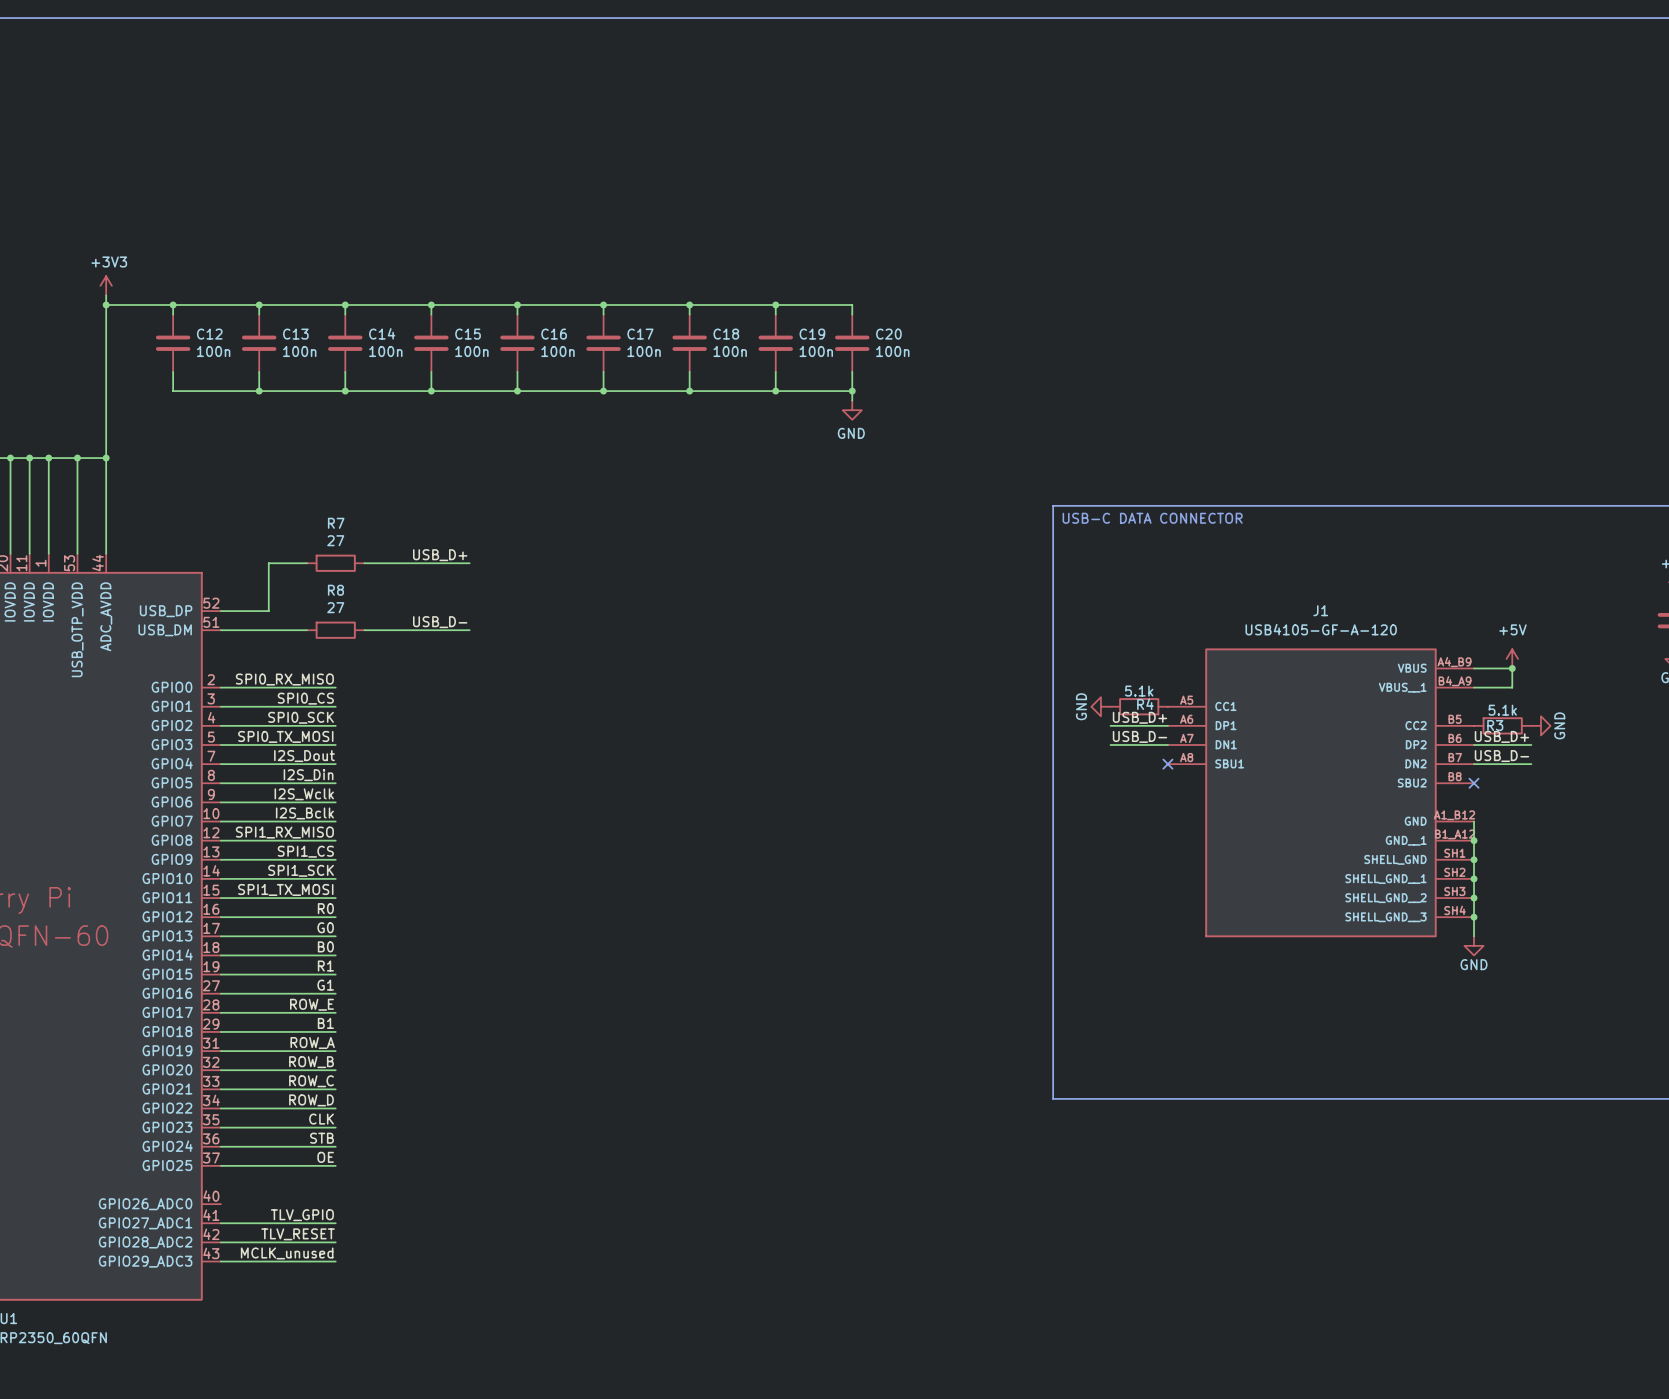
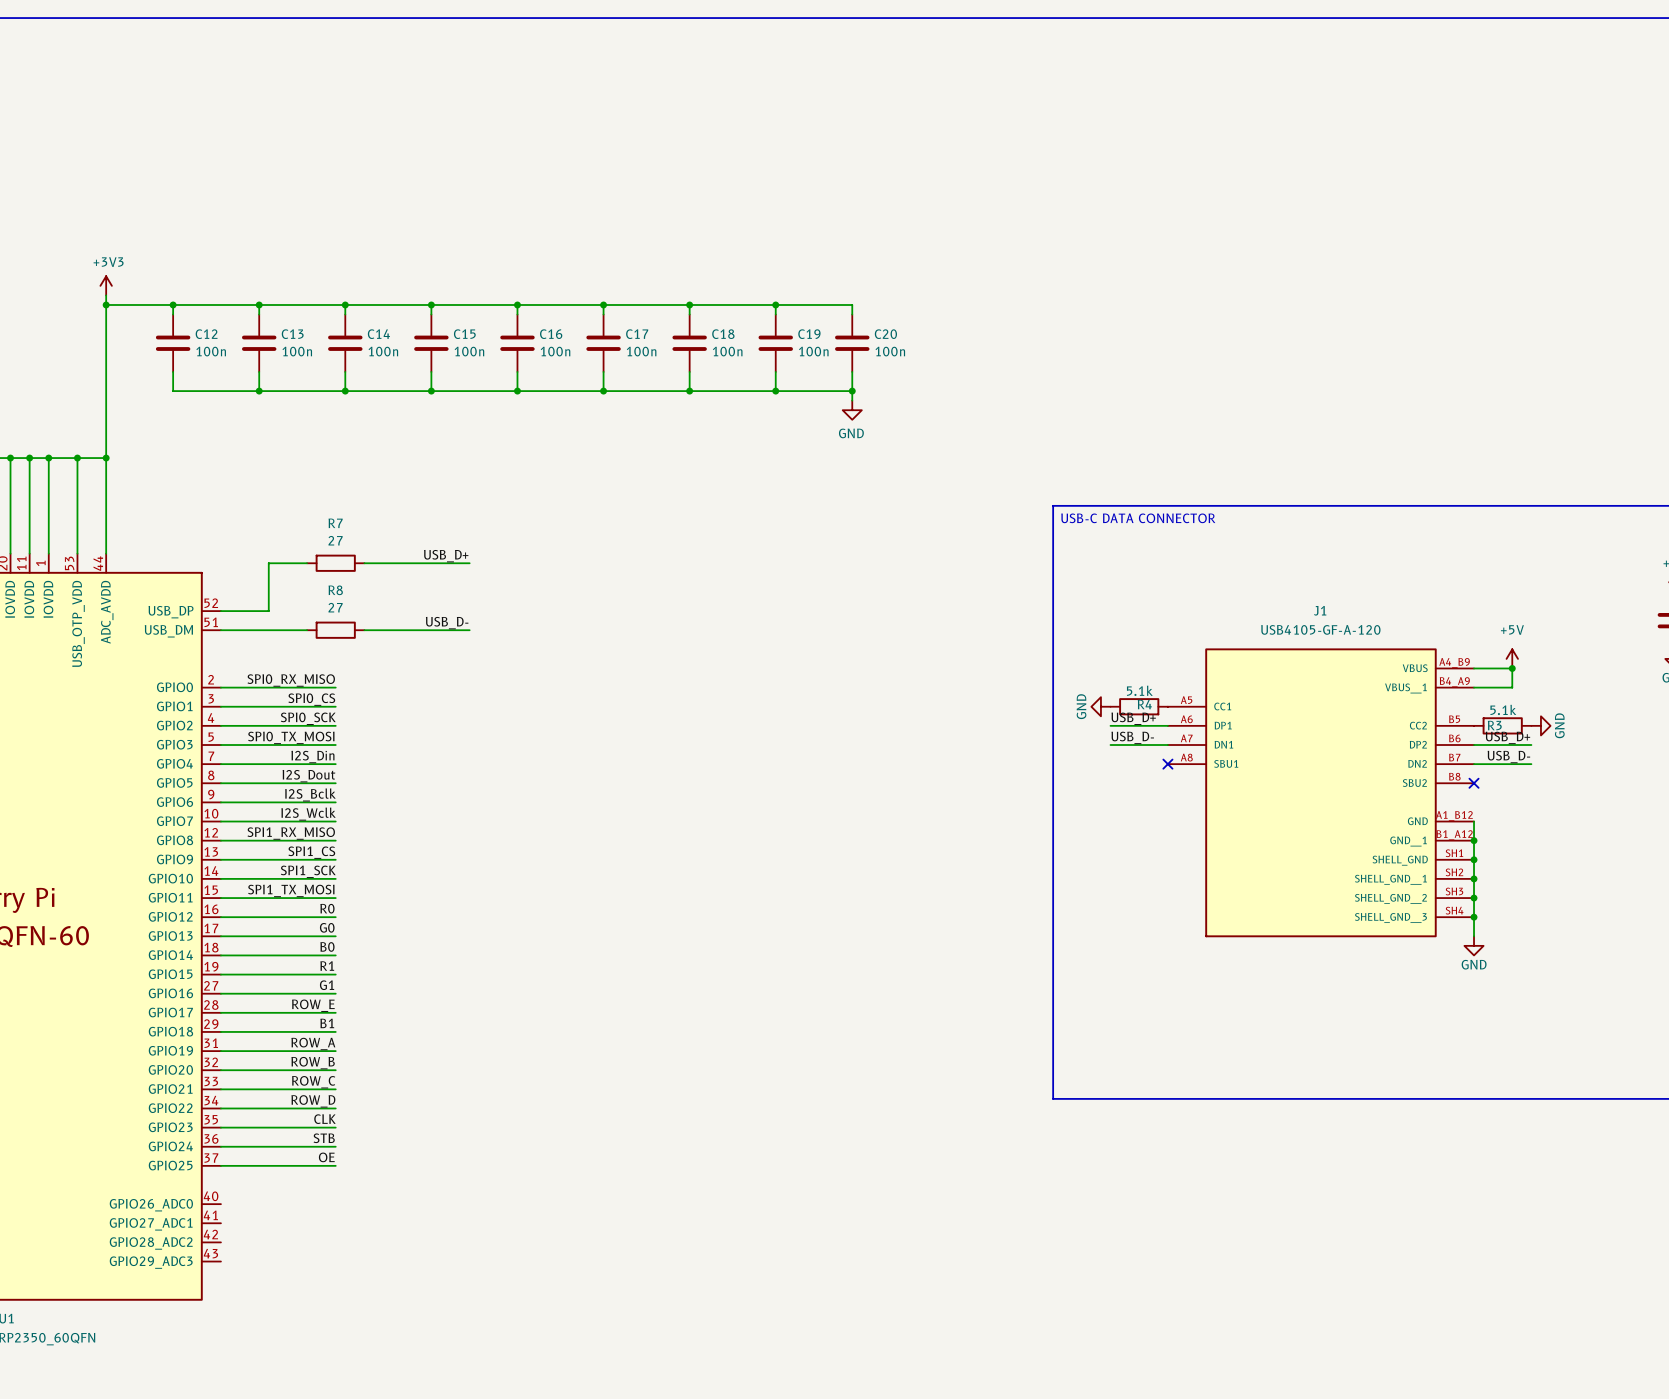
label: I2S_Dout (304, 756) -> I2S_Din (312, 757)
label: I2S_Din (308, 775) -> I2S_Dout (308, 776)
label: I2S_Wclk (304, 794) -> I2S_Bclk (310, 794)
label: I2S_Bclk (304, 813) -> I2S_Wclk (308, 814)
label: TLV_GPIO (302, 1215) -> none
wire: (220, 1223) (335, 1223) -> none
label: TLV_RESET (298, 1234) -> none
wire: (220, 1242) (335, 1242) -> none
label: MCLK_unused (287, 1253) -> none
wire: (220, 1261) (335, 1261) -> none

